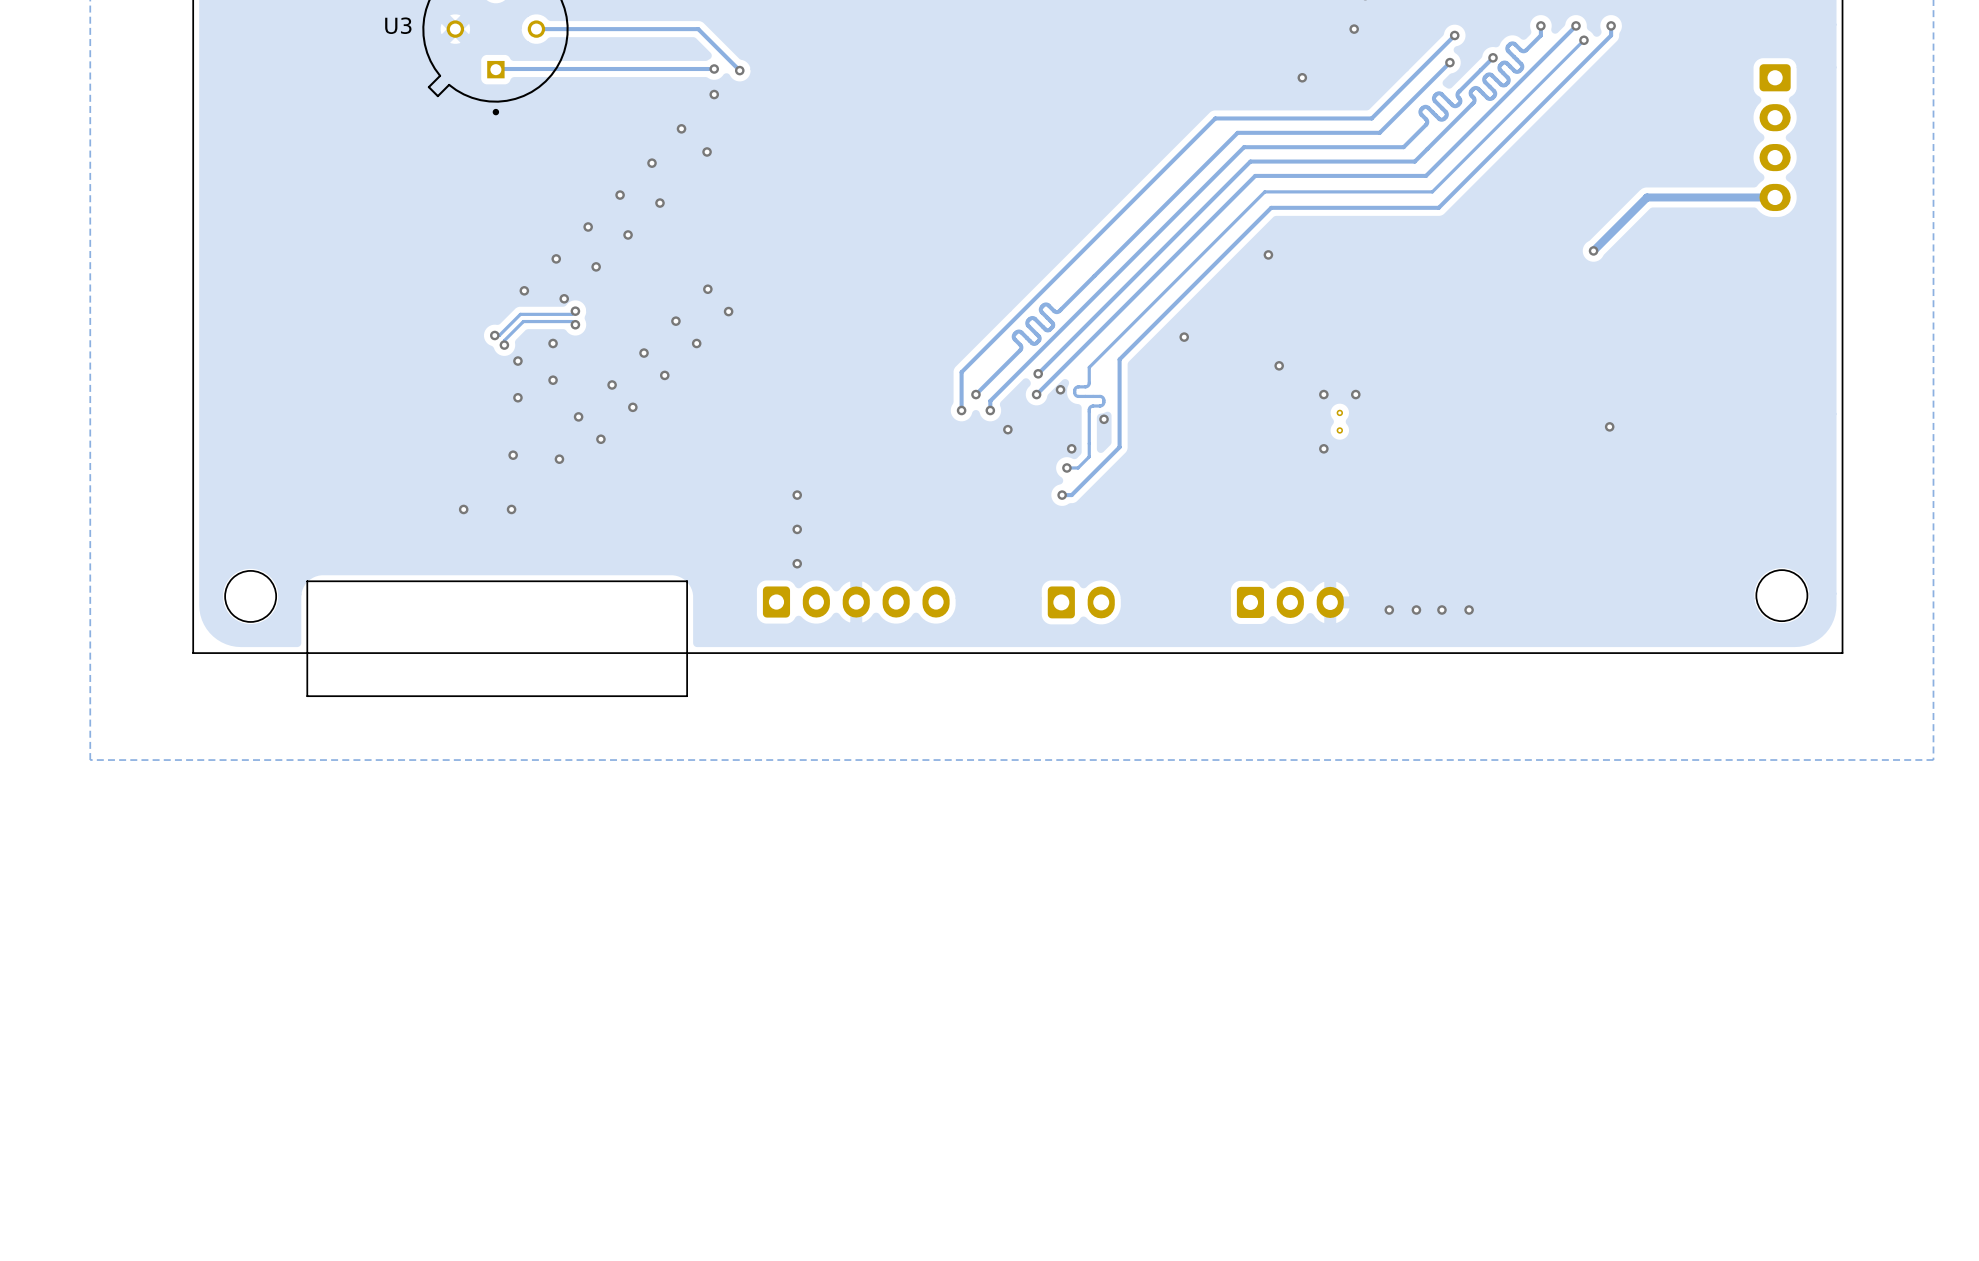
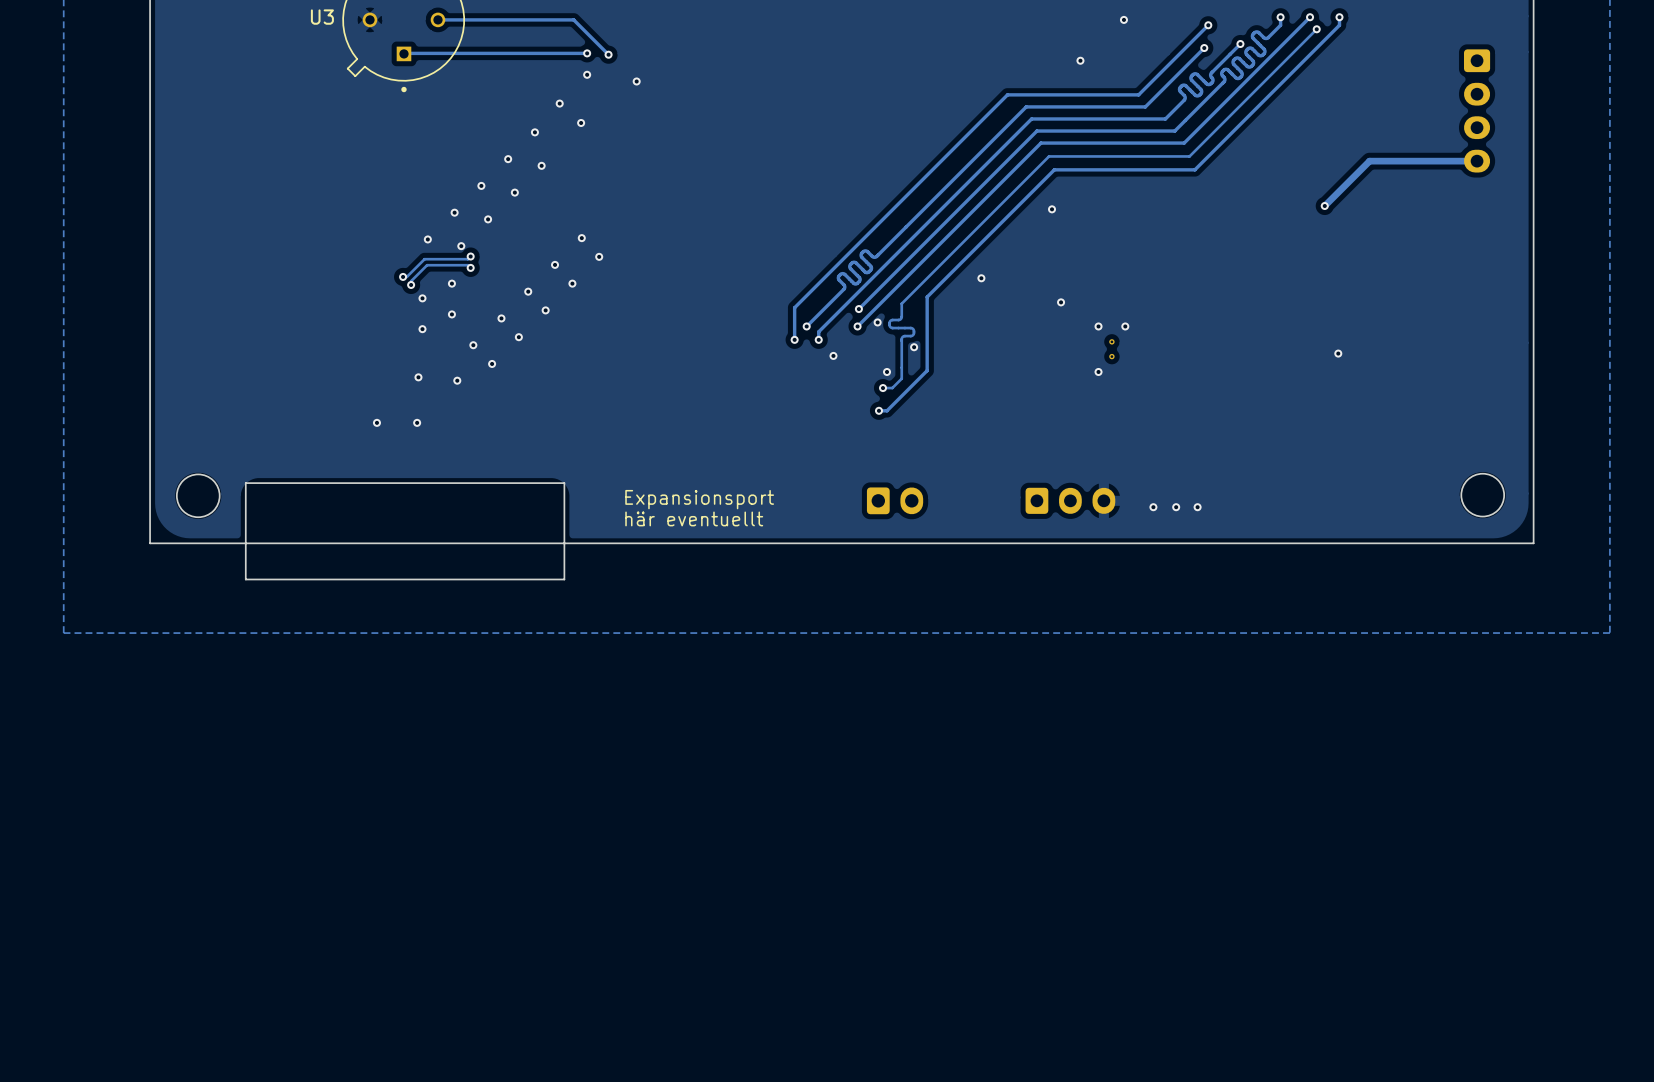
via: none -> (636, 81)
via: (797, 495) -> none
via: (797, 529) -> none
via: (797, 563) -> none
text: none -> Expansionsport (699, 499)
part: (856, 602) -> none
via: (1469, 610) -> none
text: none -> här eventuellt (694, 518)

